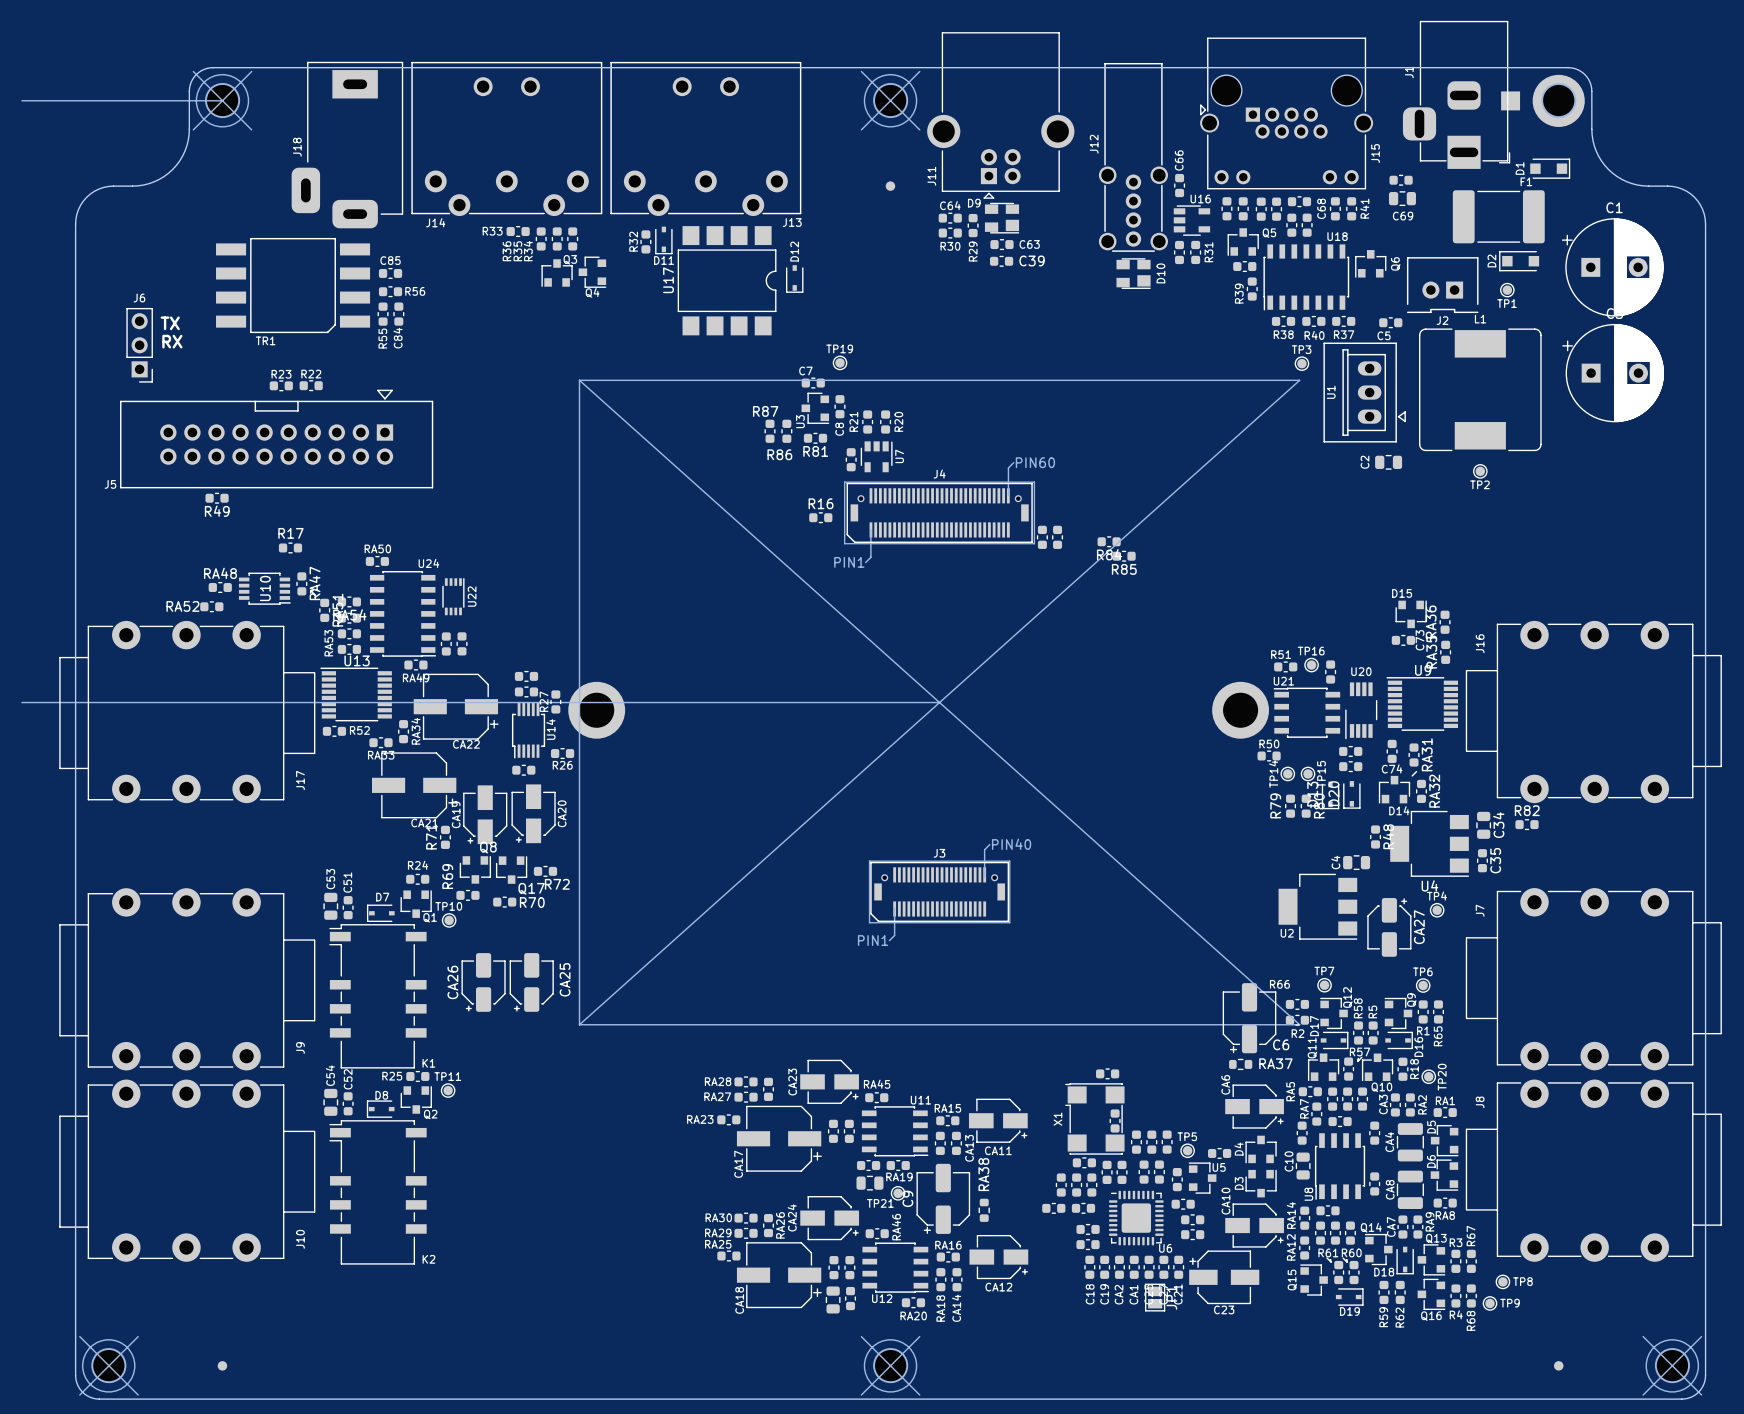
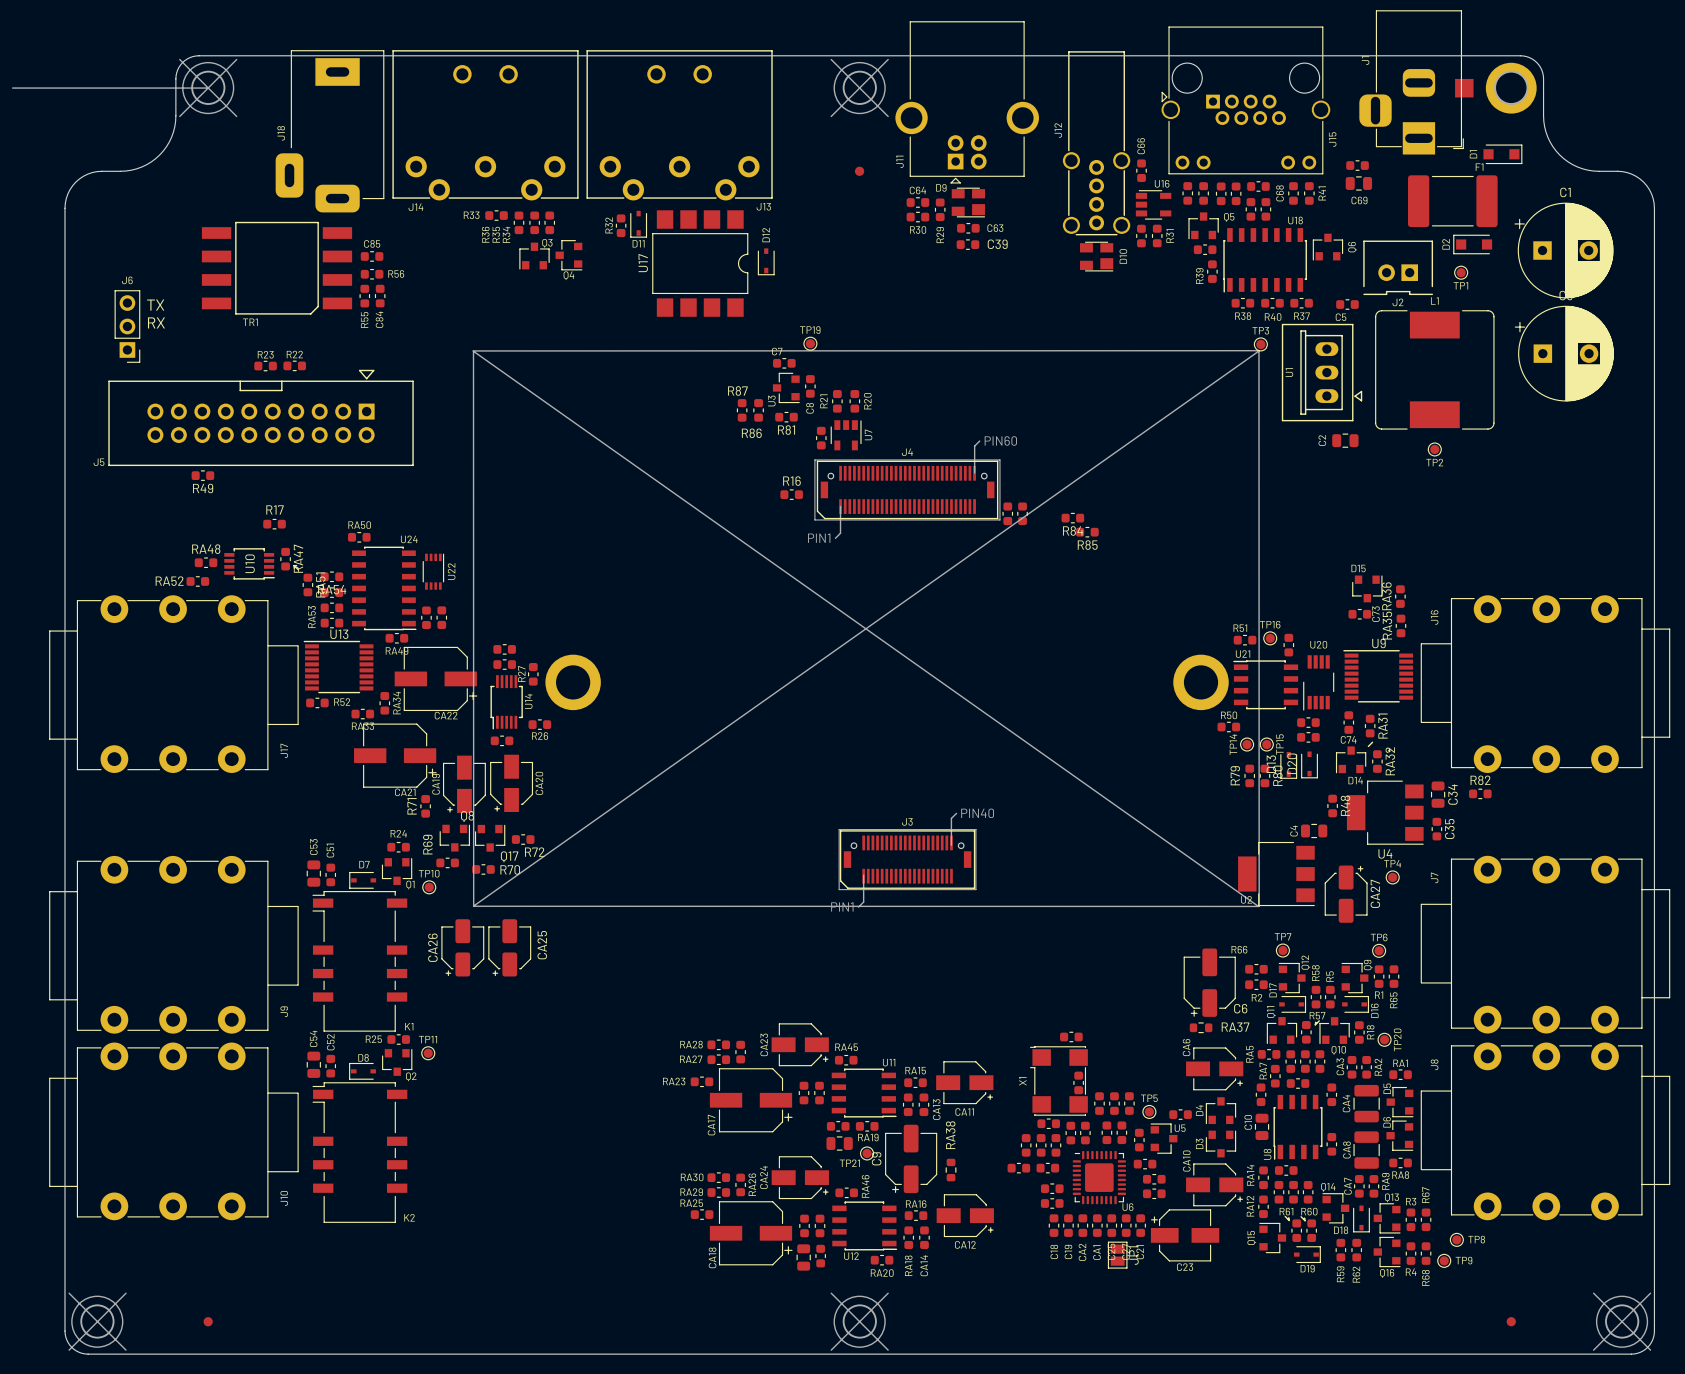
line: none -> (473, 351) (1258, 906)
line: none -> (473, 351) (473, 906)
line: none -> (1258, 351) (473, 906)
line: none -> (1259, 350) (473, 350)
line: none -> (1258, 350) (1259, 905)
line: (579, 380) (1299, 1024) (579, 1024) -> none
line: (579, 380) (1299, 380) (579, 1024) -> none
line: (579, 380) (579, 1024) -> none
line: (21, 702) (938, 702) -> none
line: none -> (474, 906) (1259, 906)

